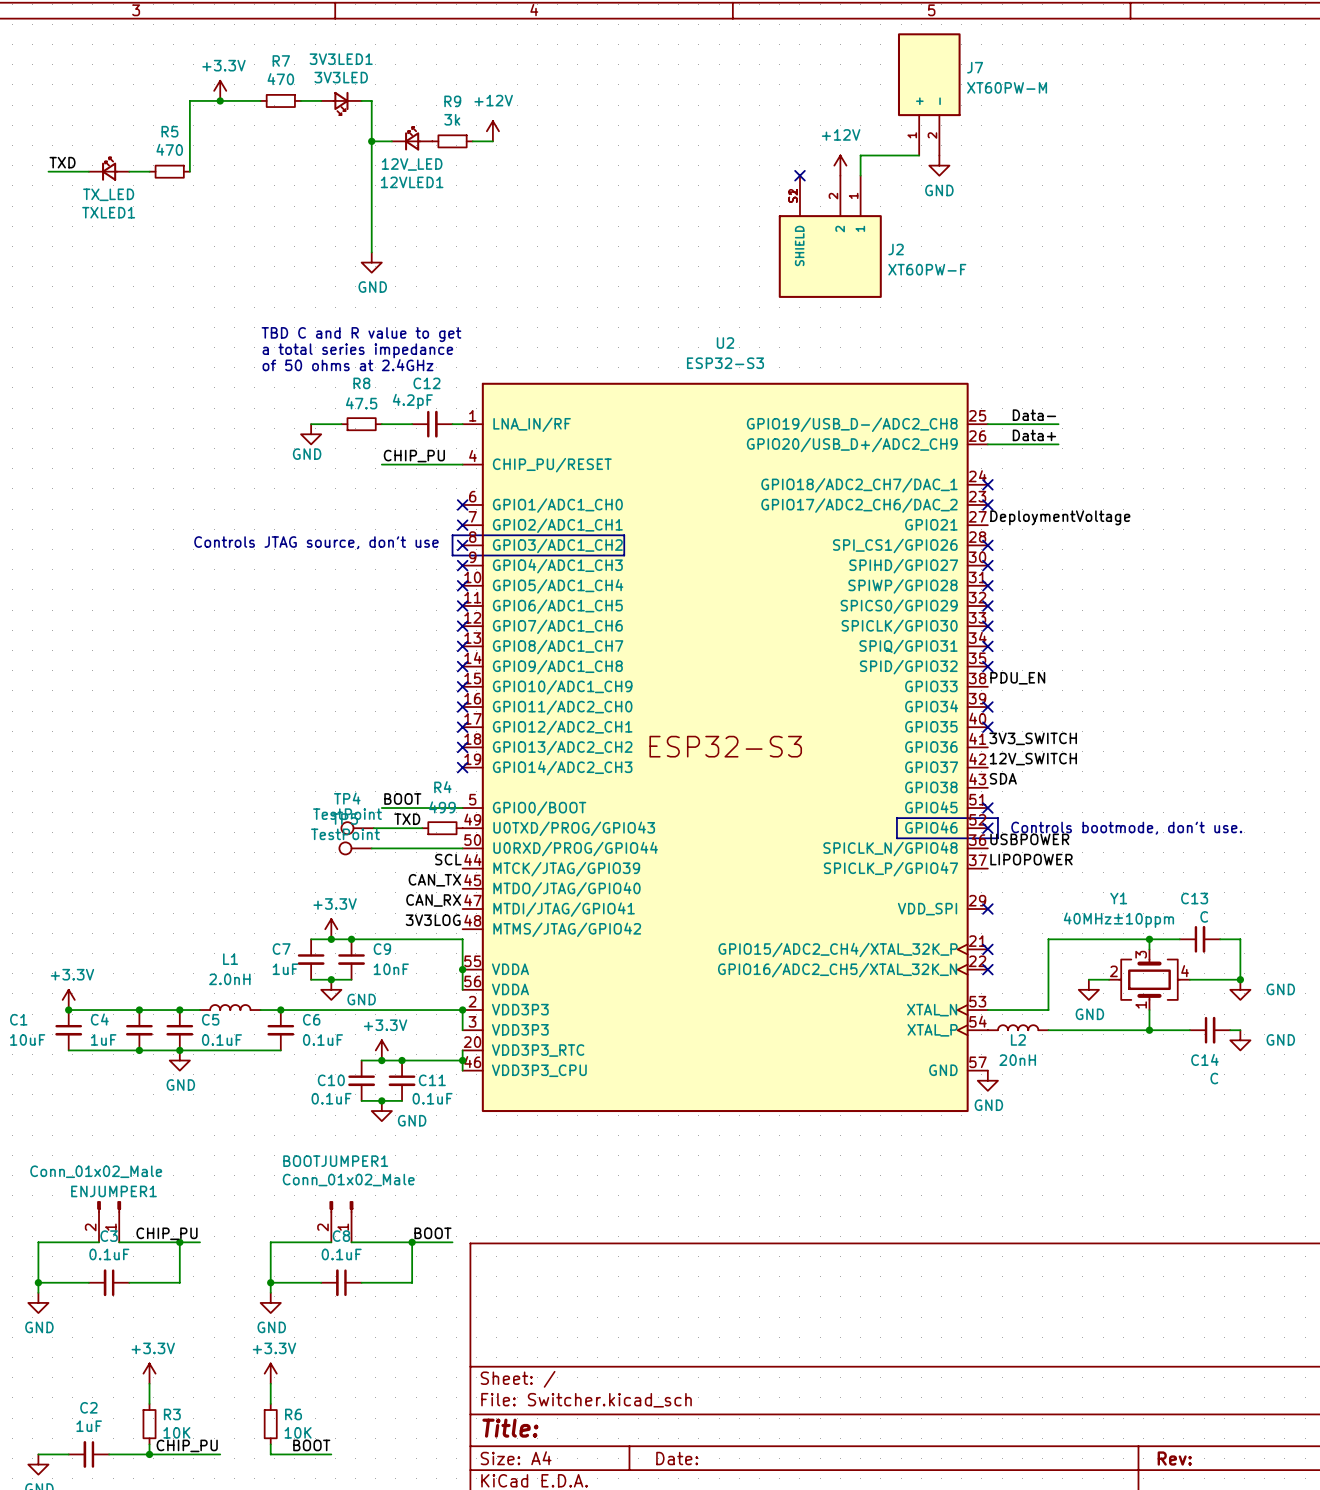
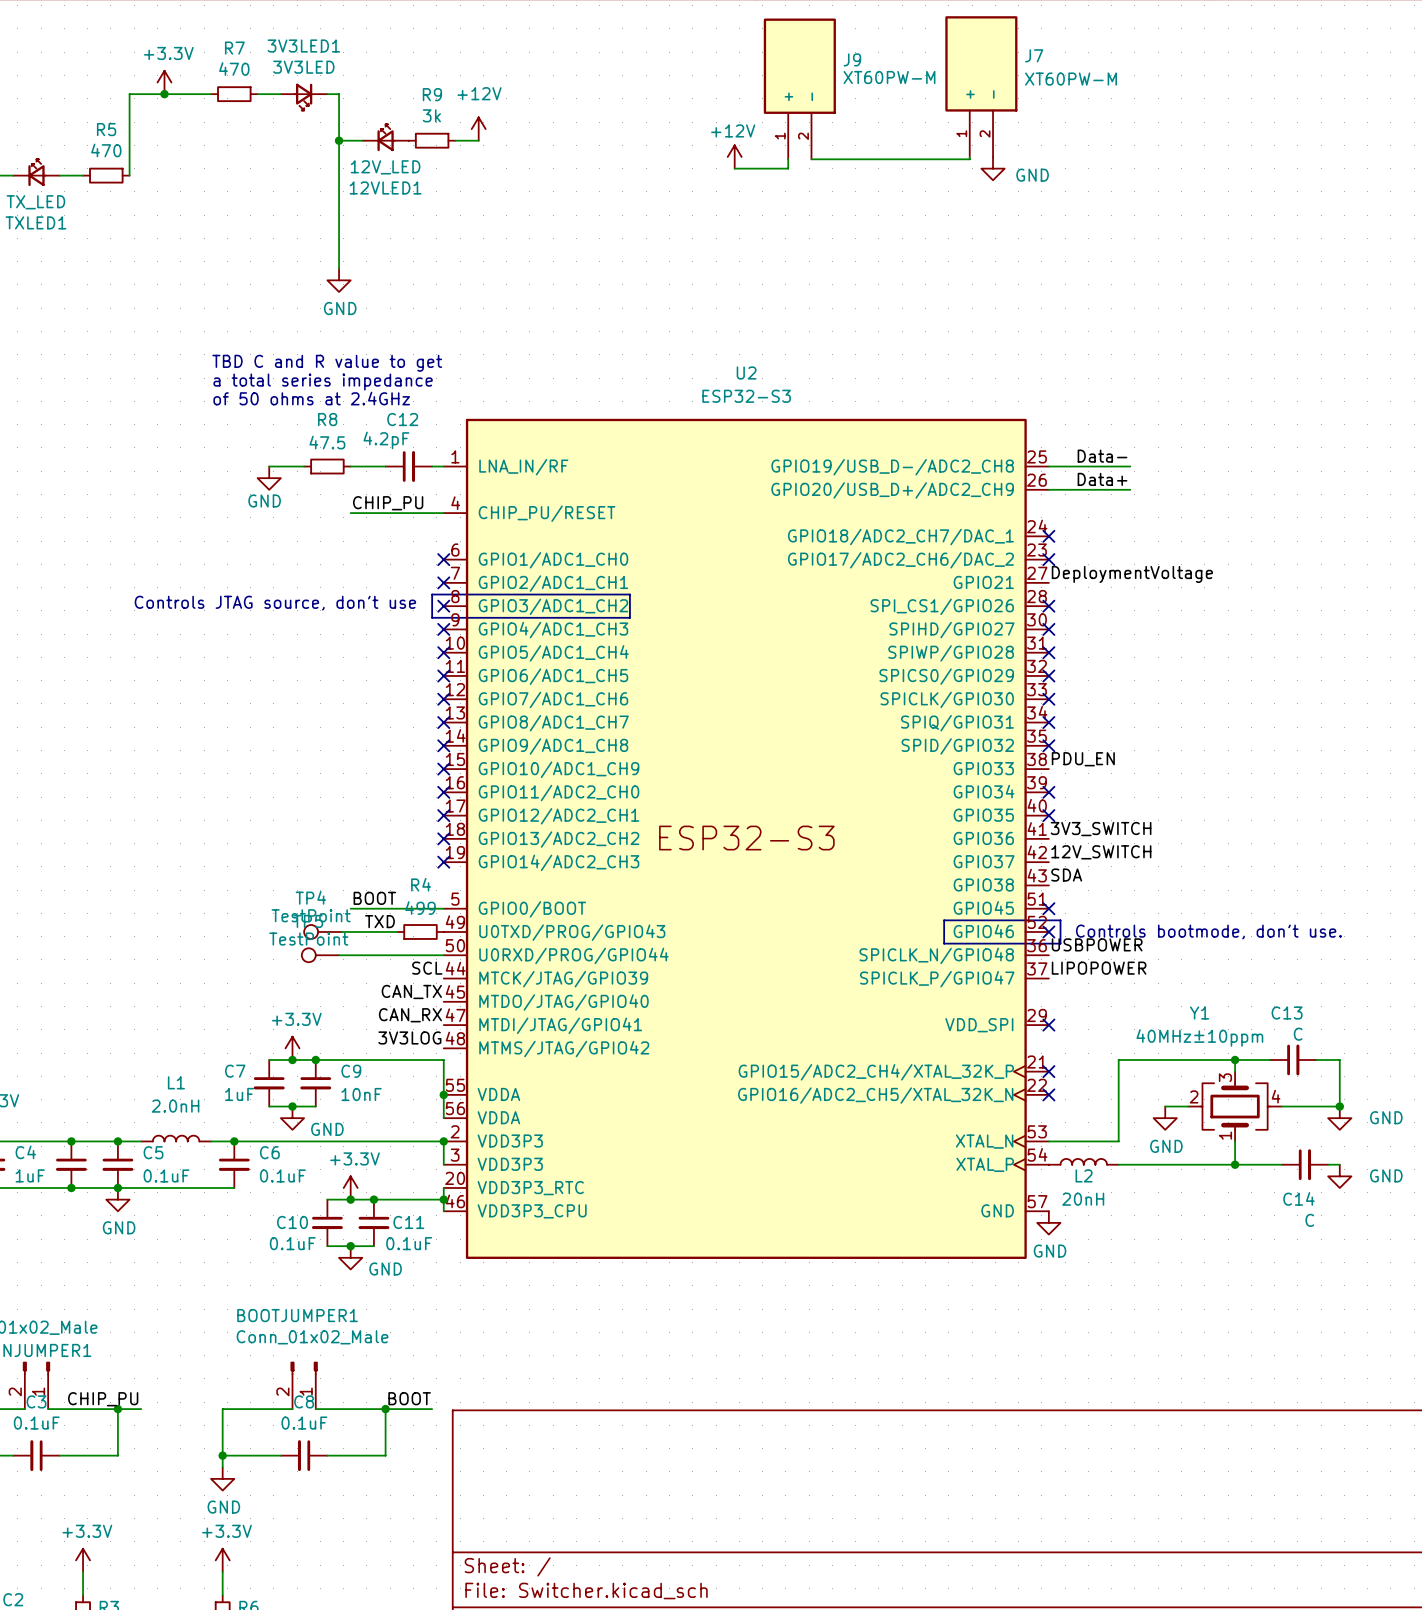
J9: none -> XT60PW-M (799, 88)
power symbol text position: +12V (841, 134) -> +12V (733, 130)
wire: (919, 155) (860, 155) (860, 175) -> (969, 156) (969, 159) (811, 159)
wire: none -> (788, 159) (788, 168) (734, 168)
power symbol position: +12V (840, 165) -> +12V (734, 156)
no-connect mark: (799, 175) -> none
power symbol text position: GND (939, 190) -> GND (1032, 175)
J2: XT60PW-F (830, 236) -> none

